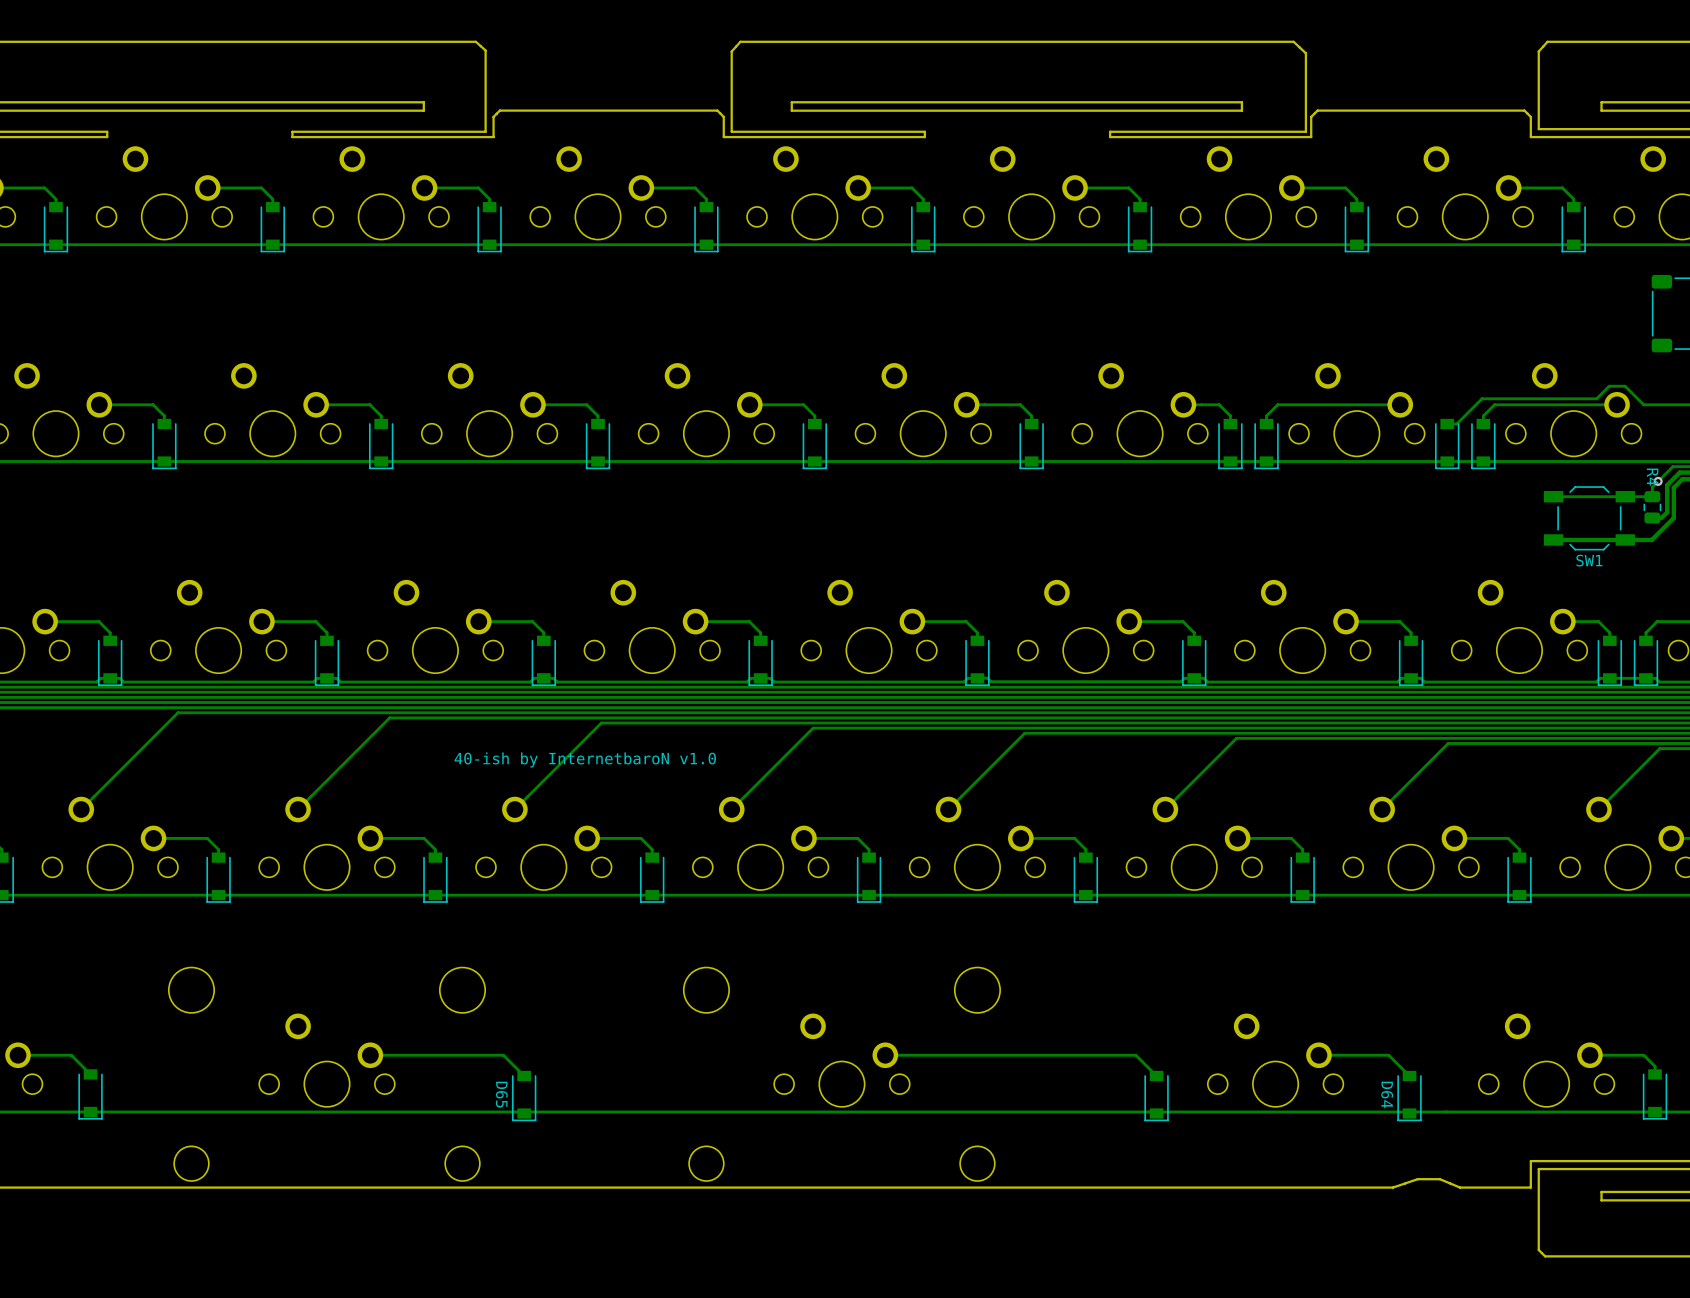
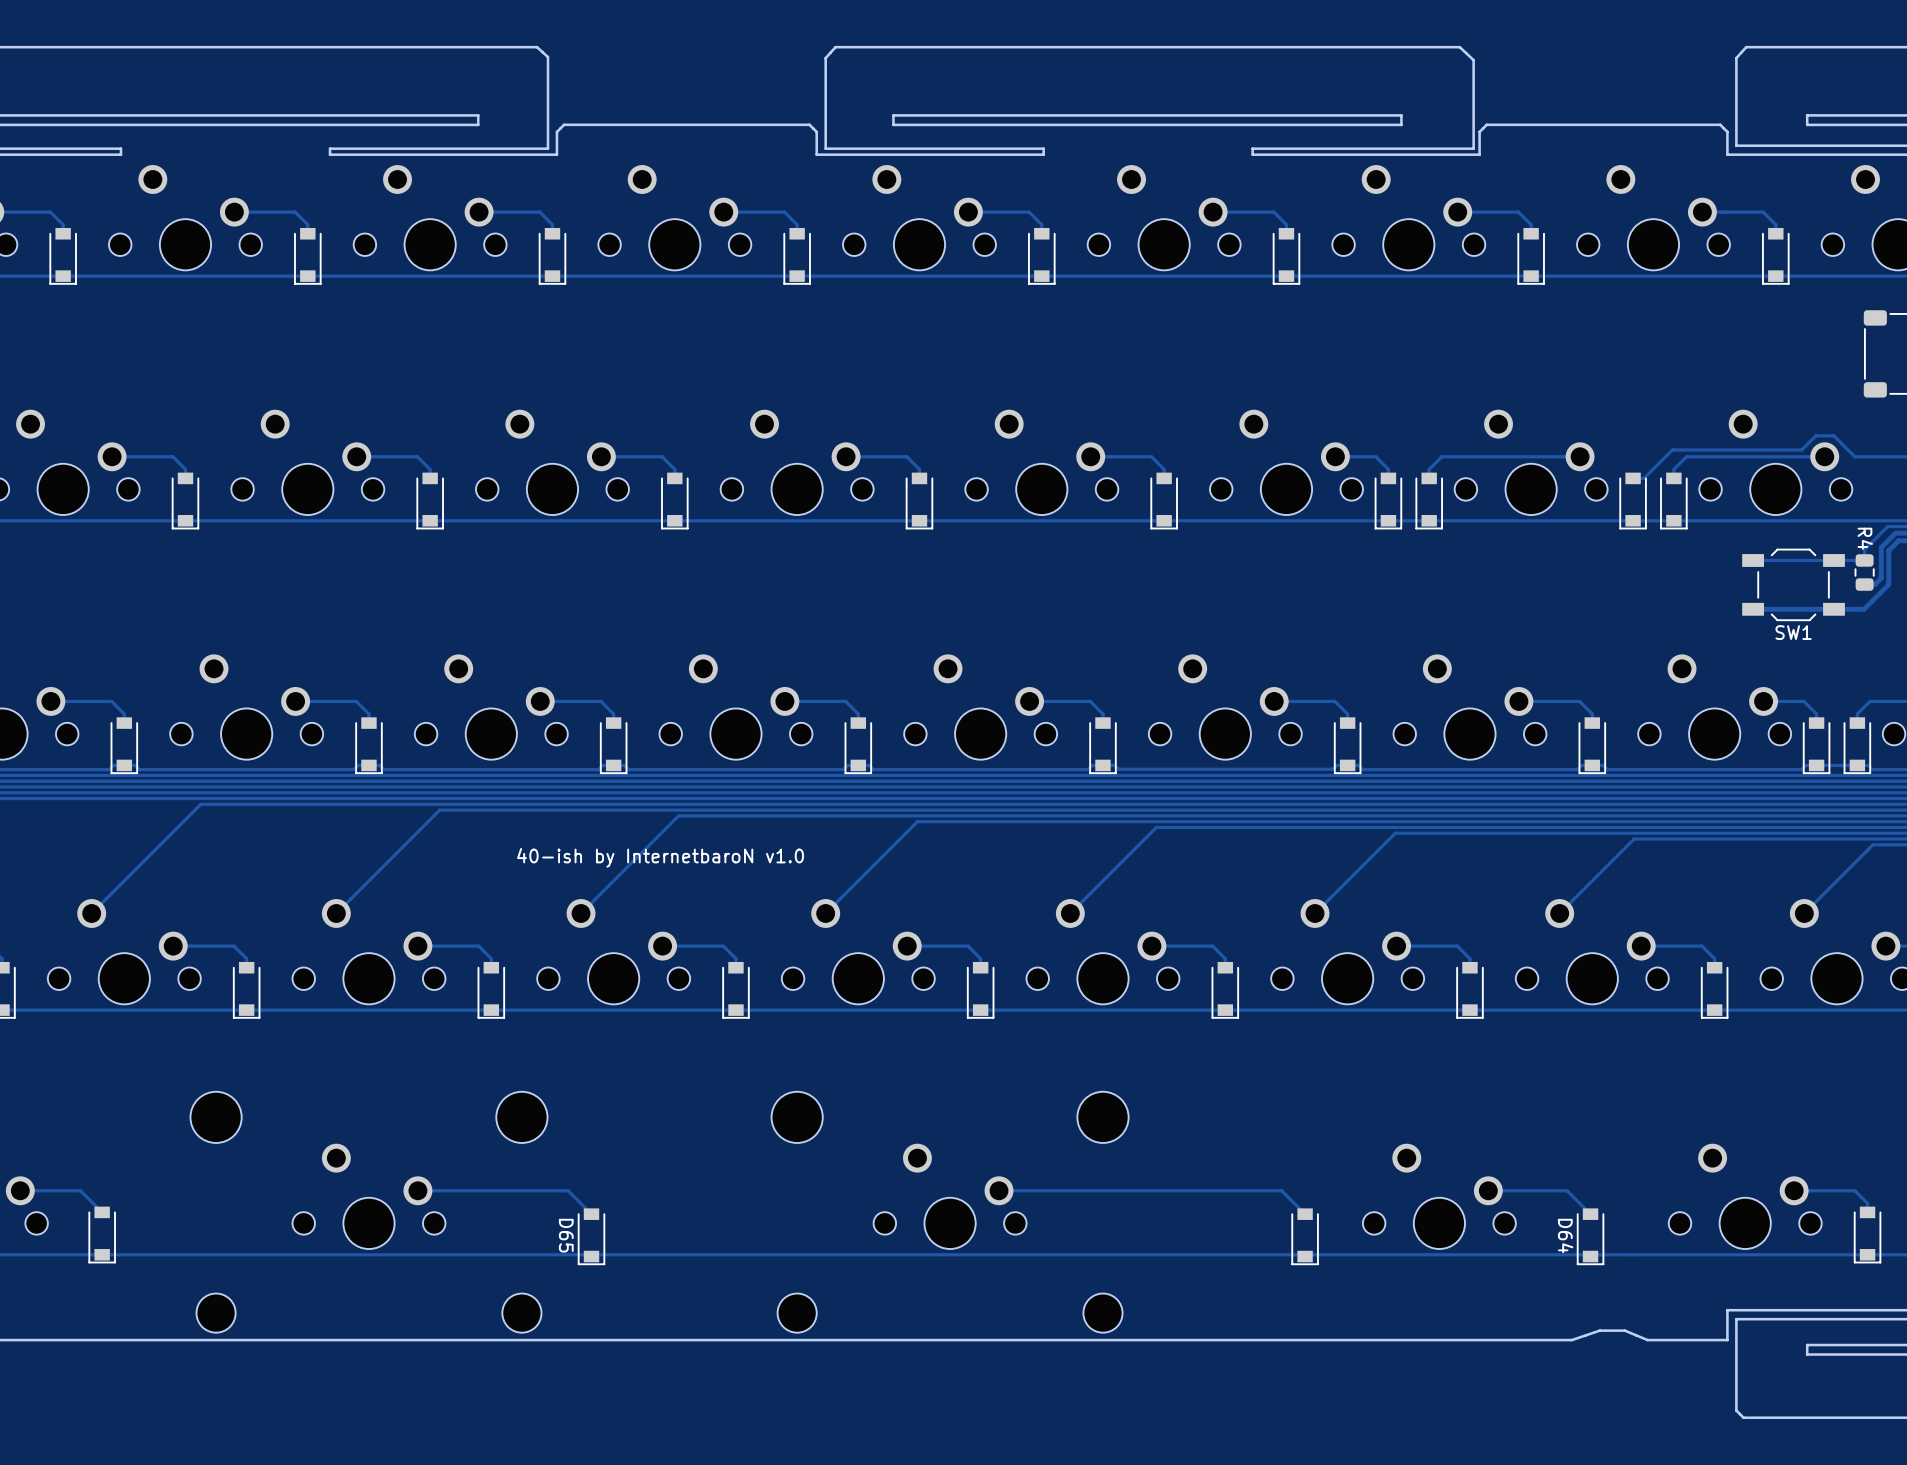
via: (1658, 481) -> none

